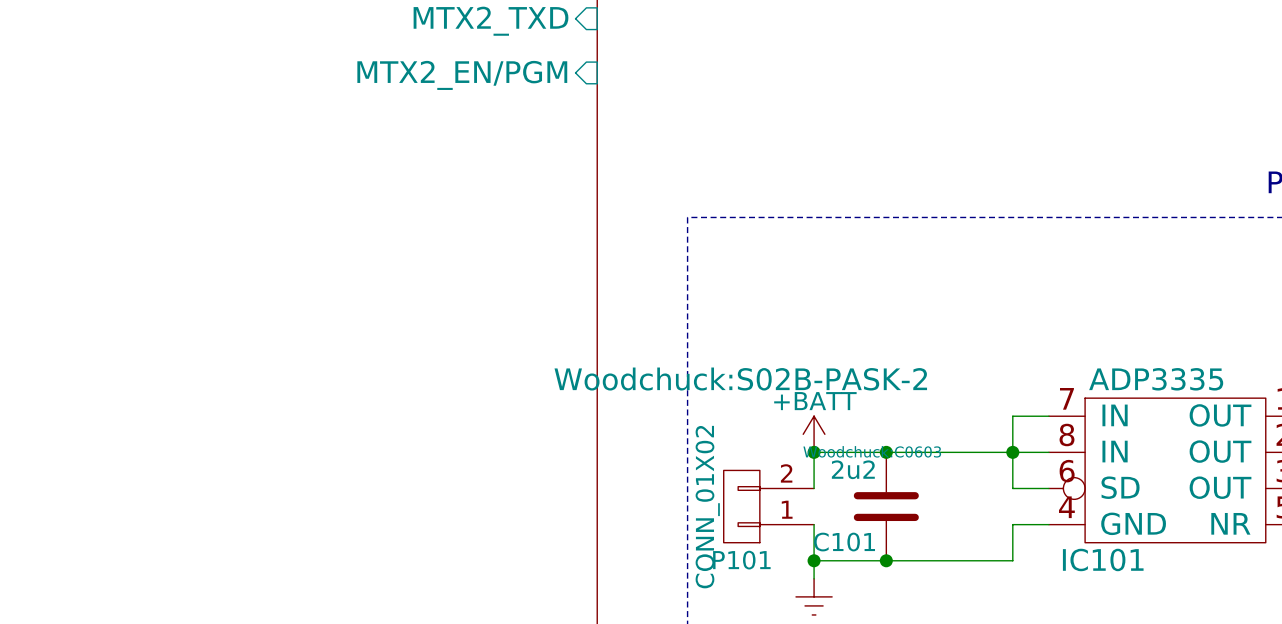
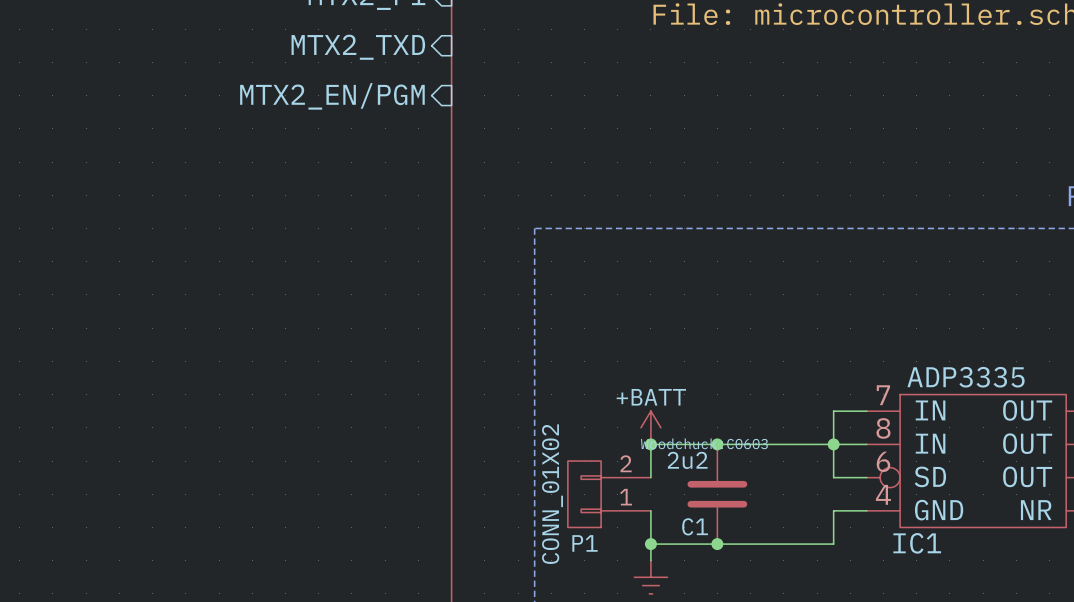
P101 text: Woodchuck:S02B-PASK-2 (740, 379) -> none
C101 name: C101 (844, 542) -> C1 (695, 526)
IC101 name: IC101 (1103, 559) -> IC1 (917, 543)
P101 name: P101 (741, 560) -> P1 (584, 543)

